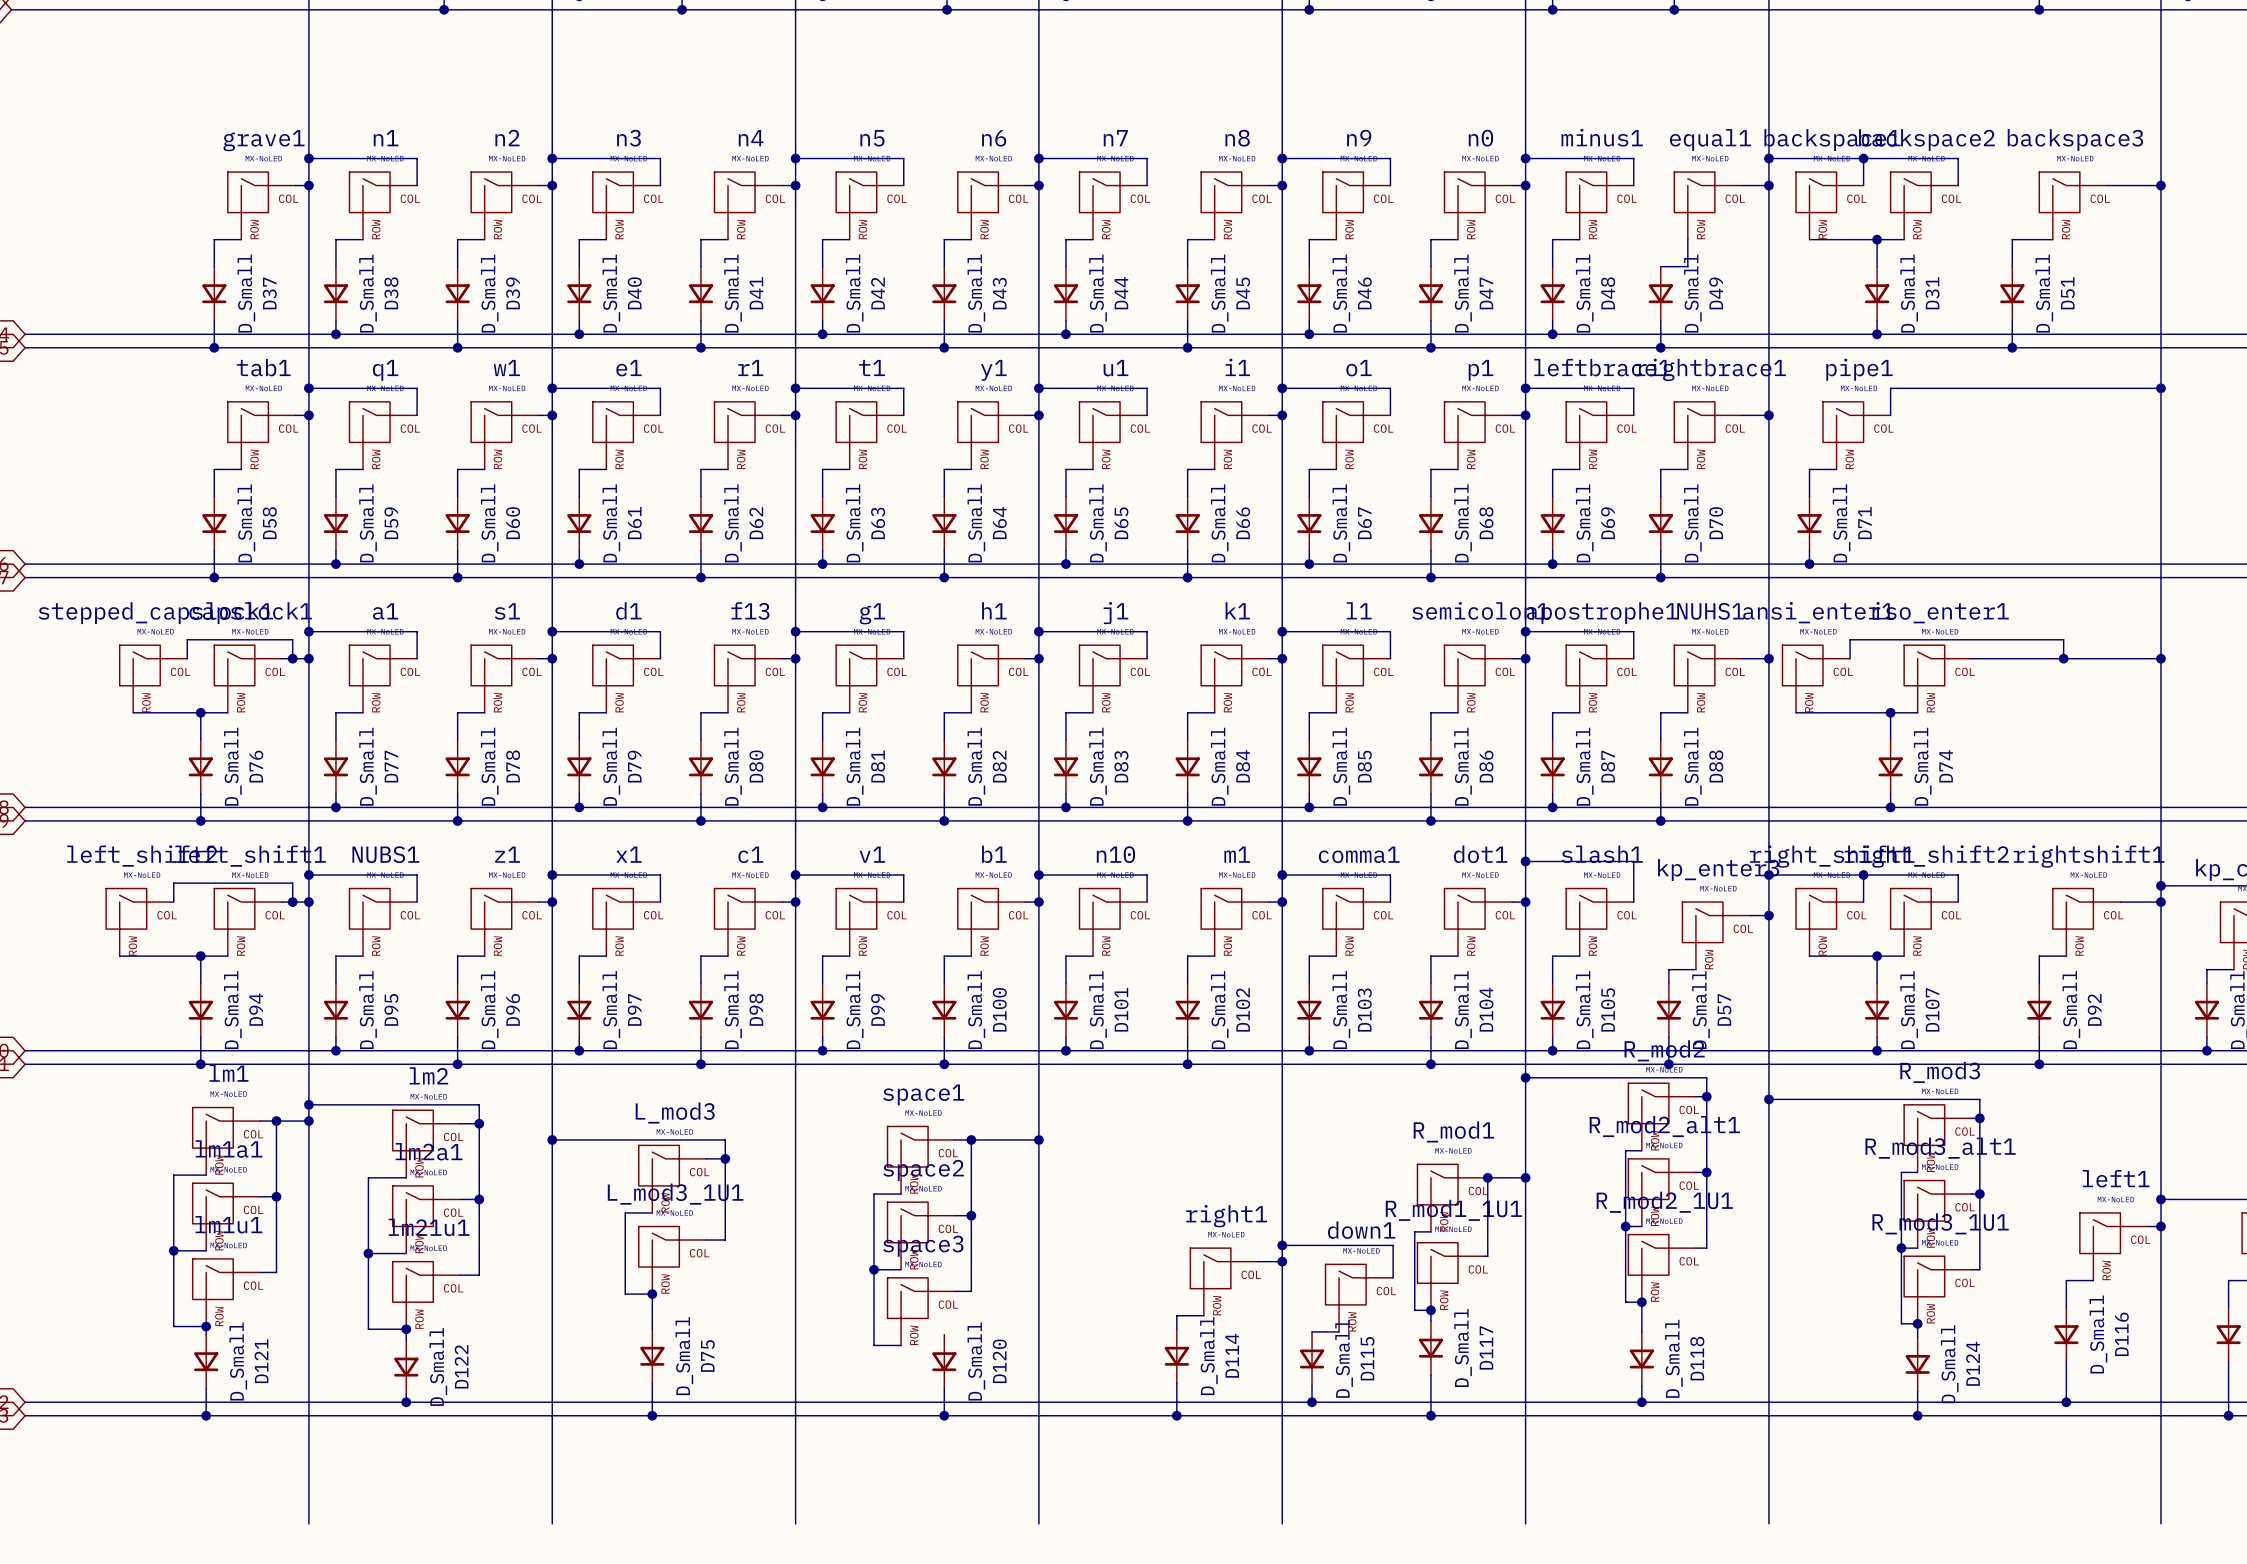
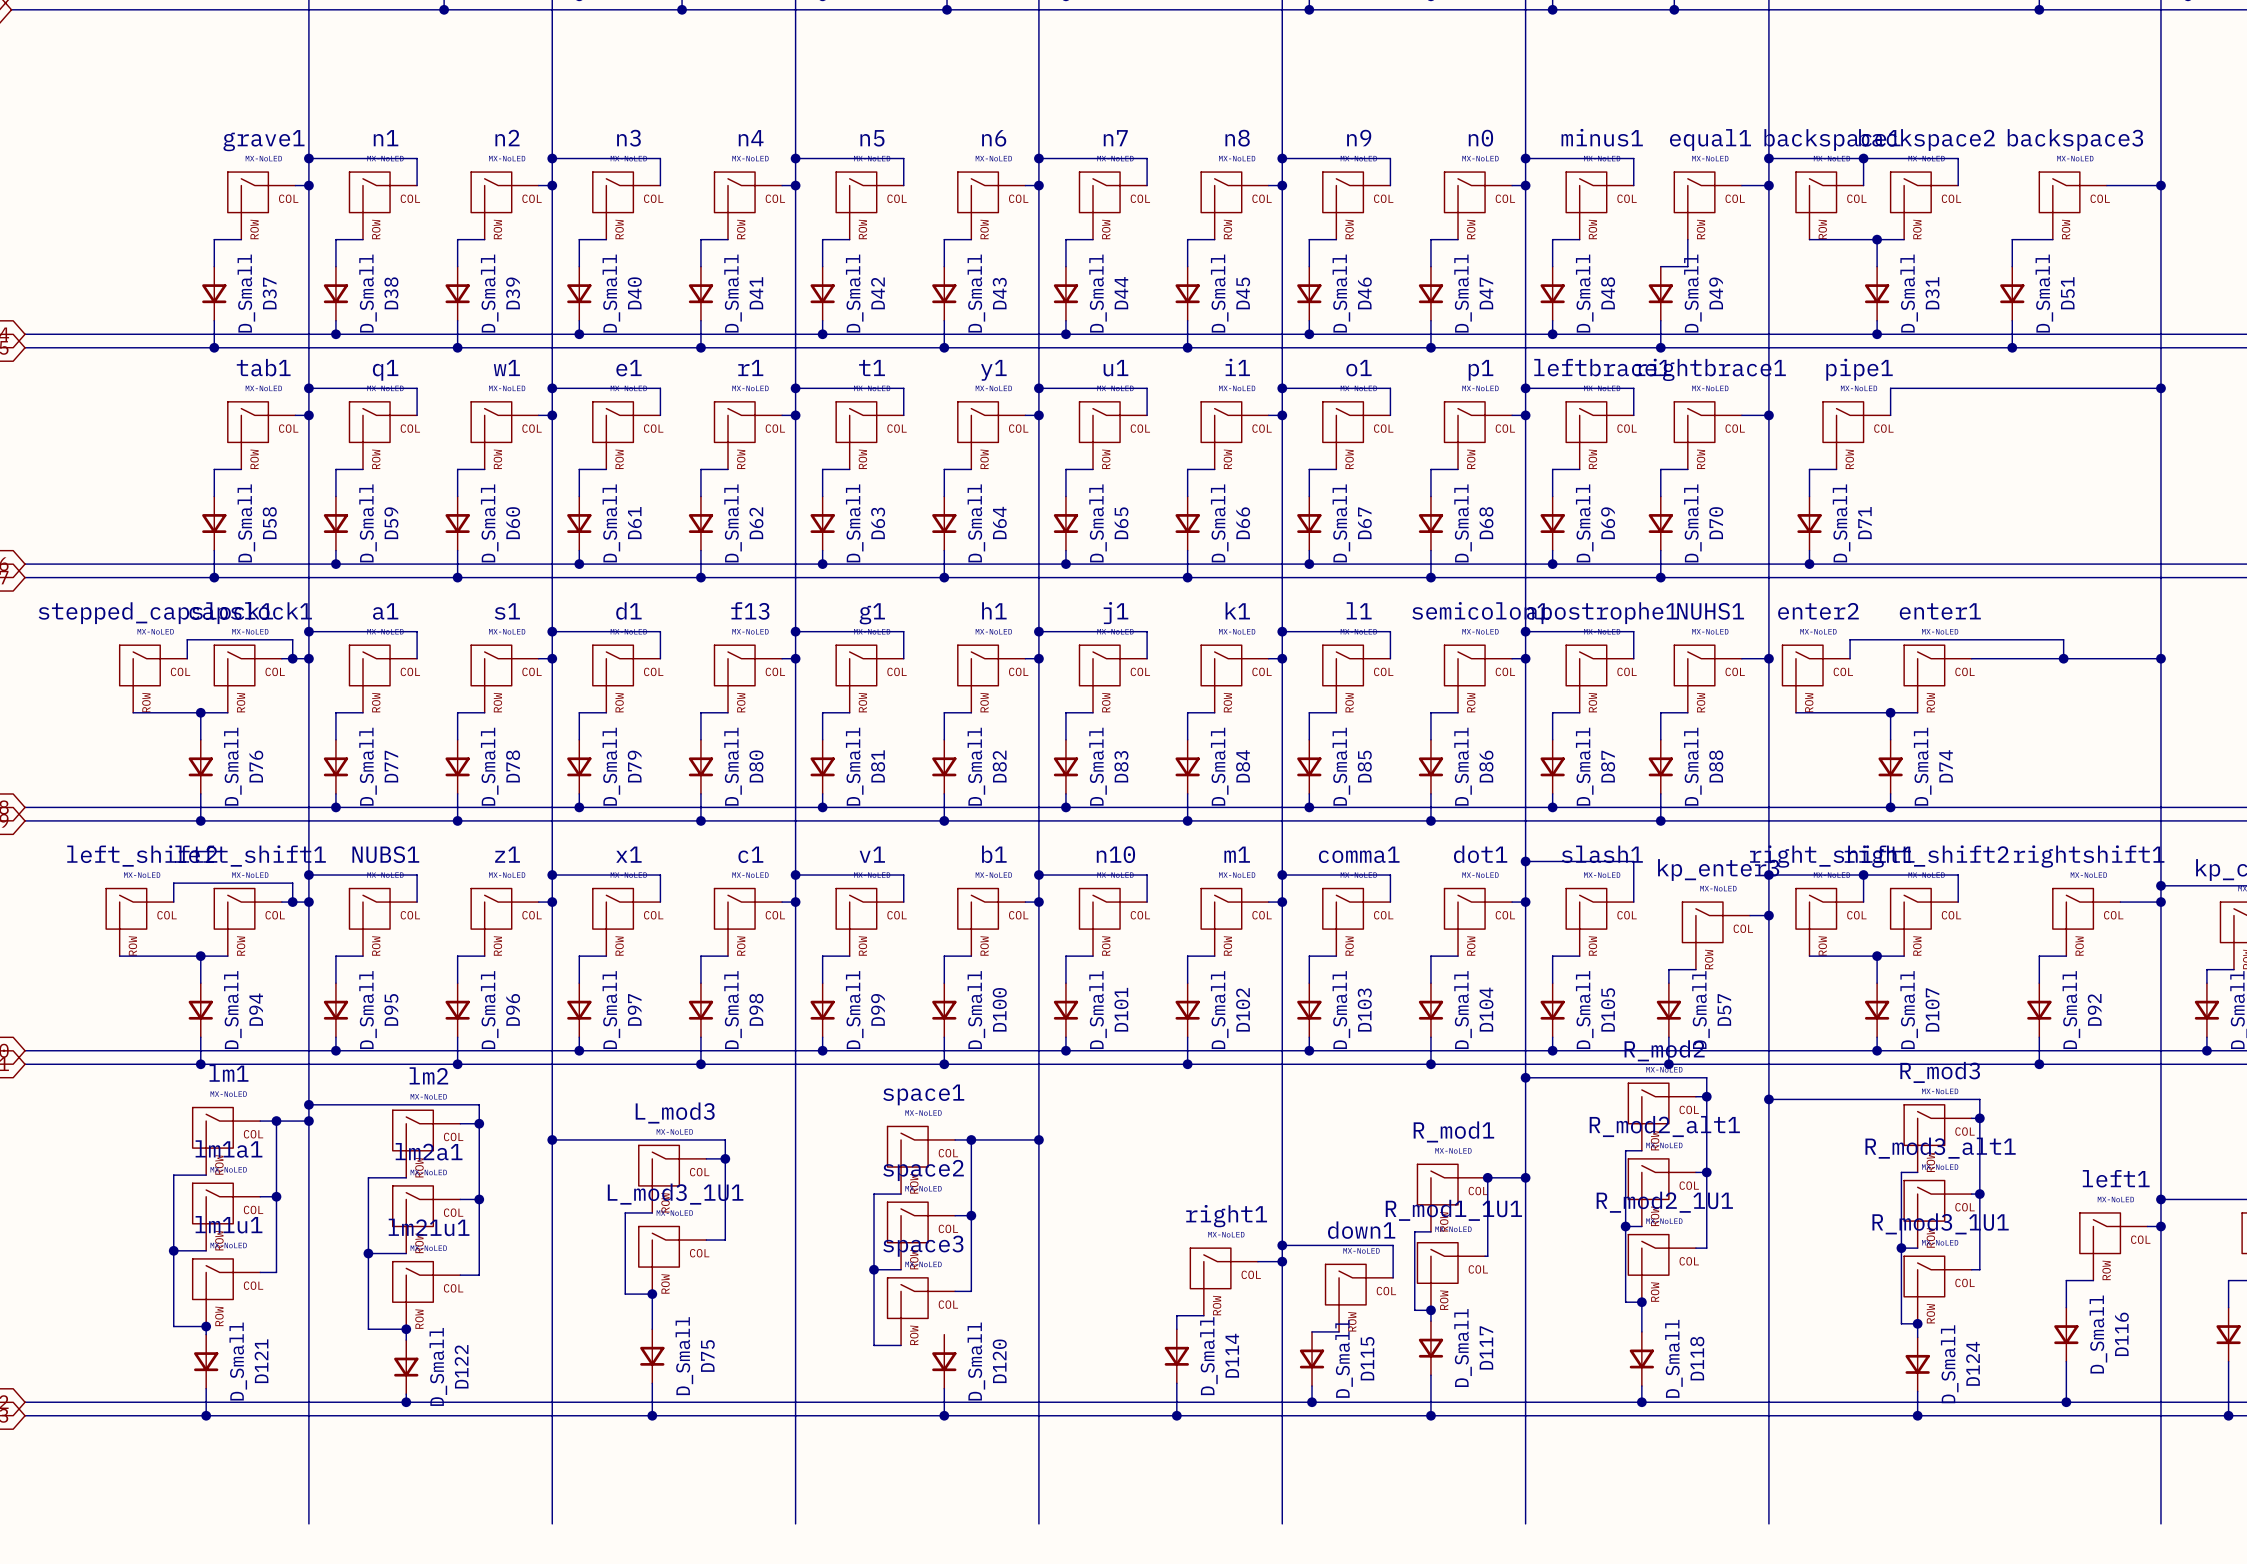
ansi_enter1 name: ansi_enter1 (1818, 612) -> enter2 (1818, 611)
iso_enter1 name: iso_enter1 (1940, 612) -> enter1 (1940, 611)

